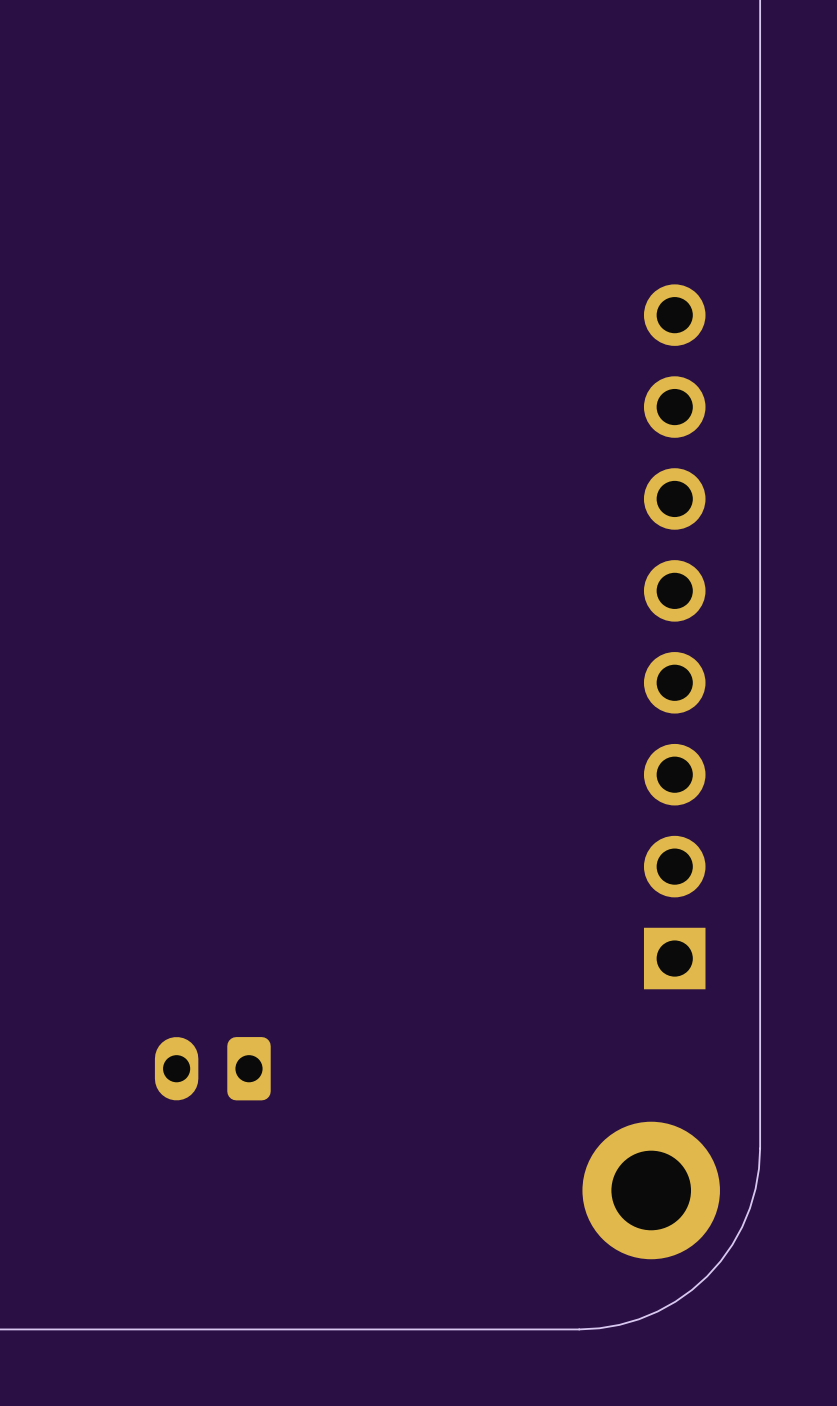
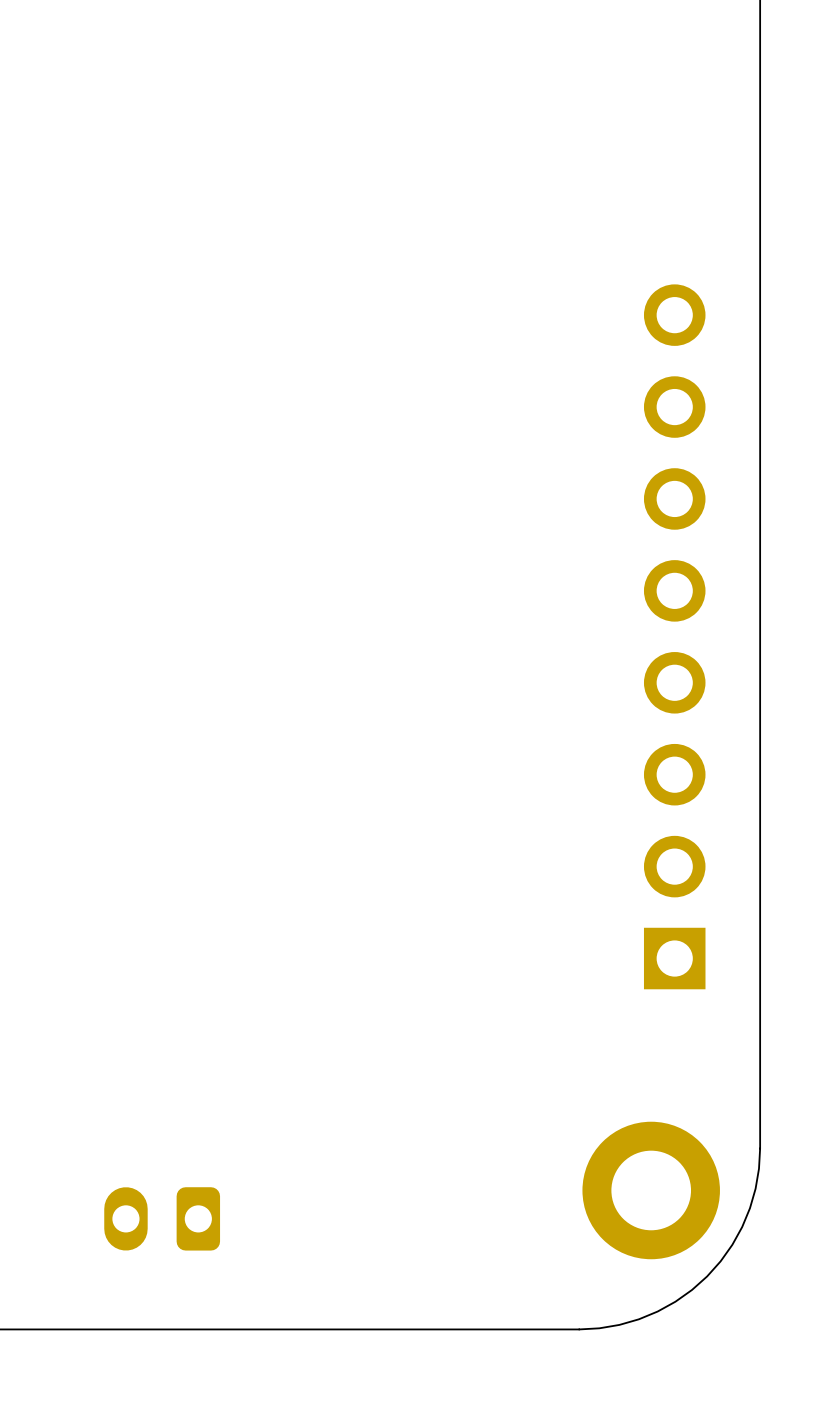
part position: (212, 1068) -> (162, 1218)

